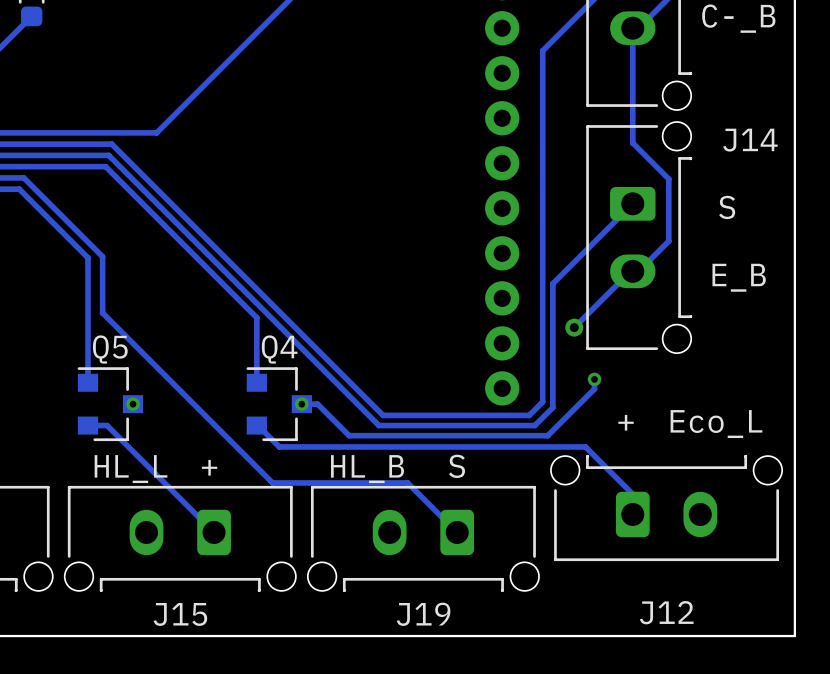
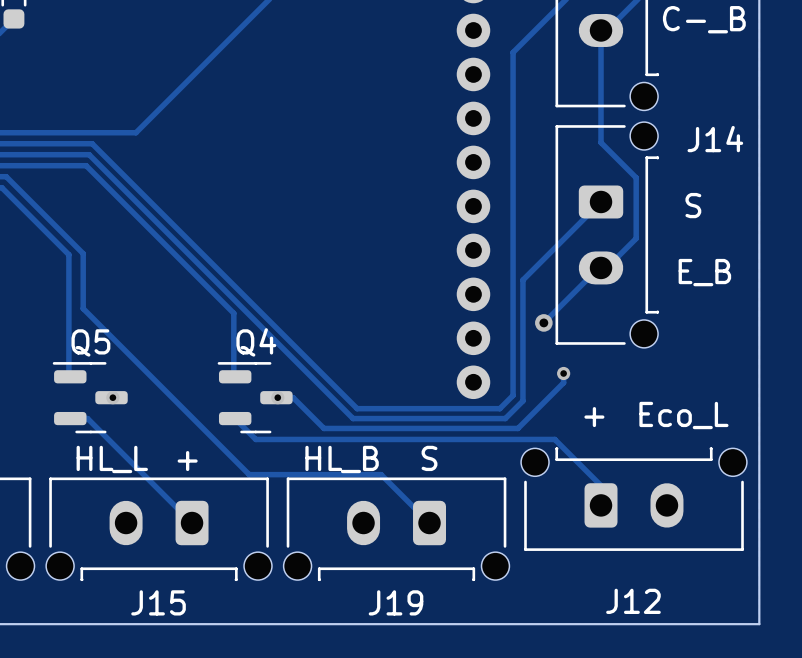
Q5 footprint: [77, 367, 144, 442] -> [52, 362, 128, 434]
Q4 footprint: [246, 367, 312, 442] -> [217, 362, 293, 434]

